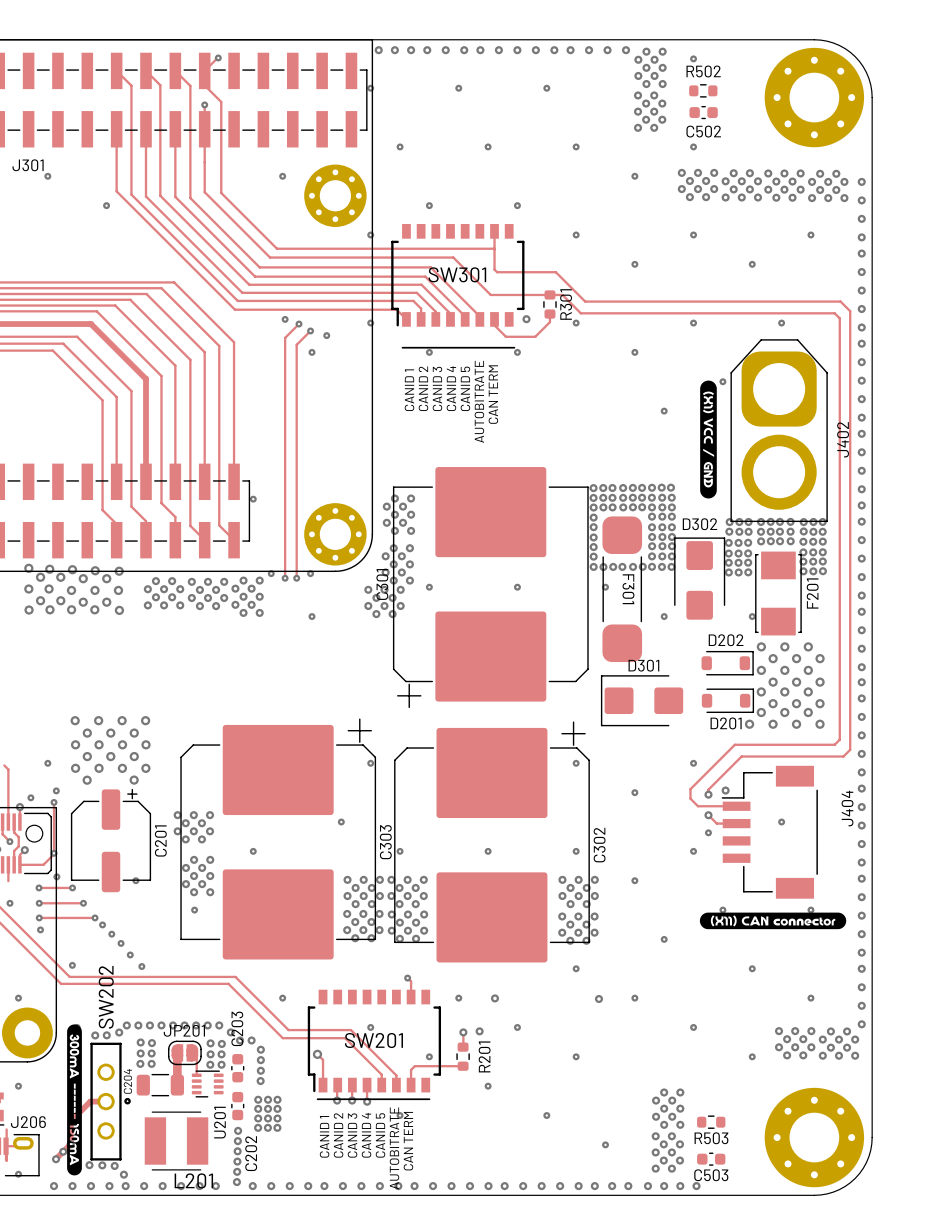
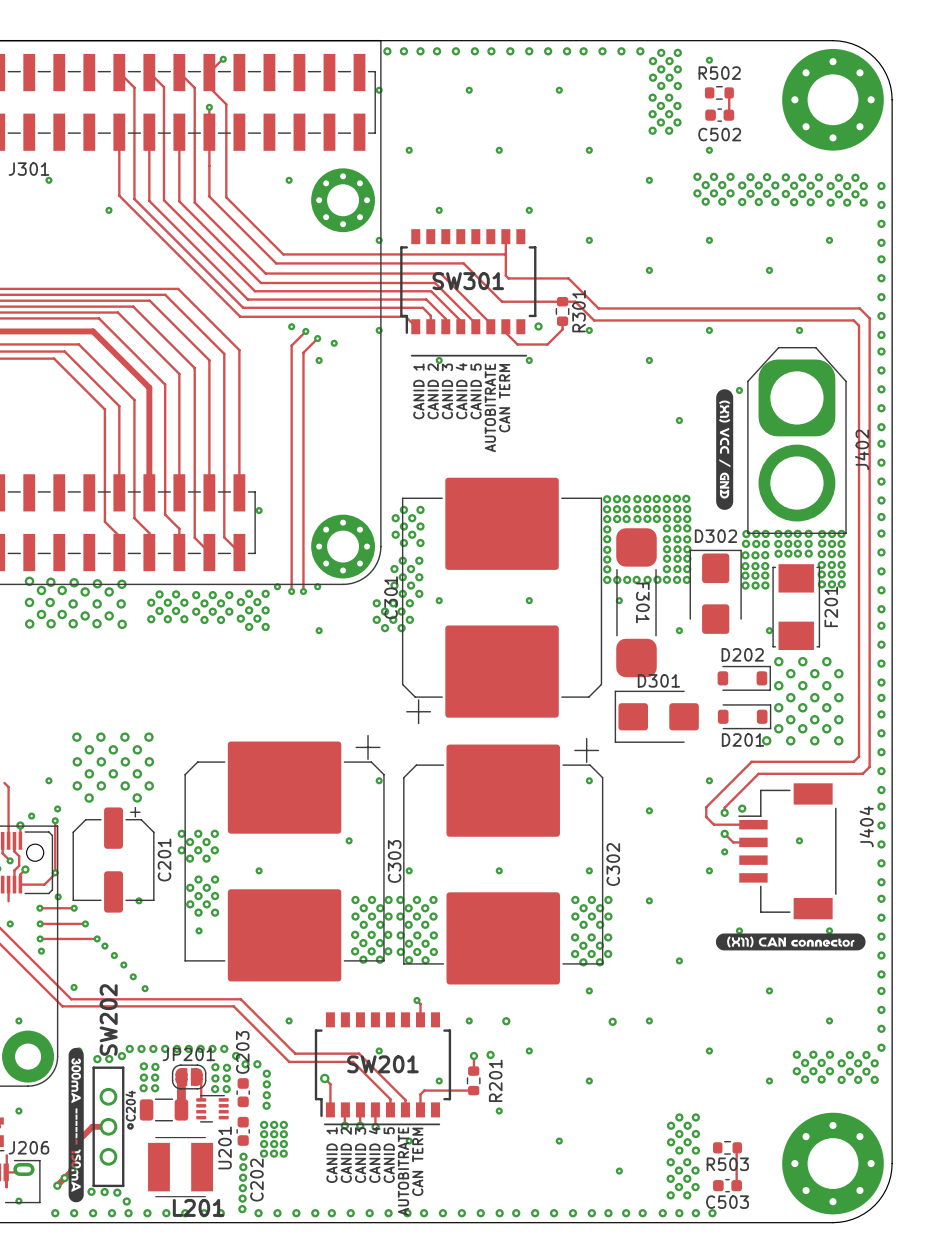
track: none -> (729, 92) (729, 114)
track: none -> (736, 1148) (736, 1185)

